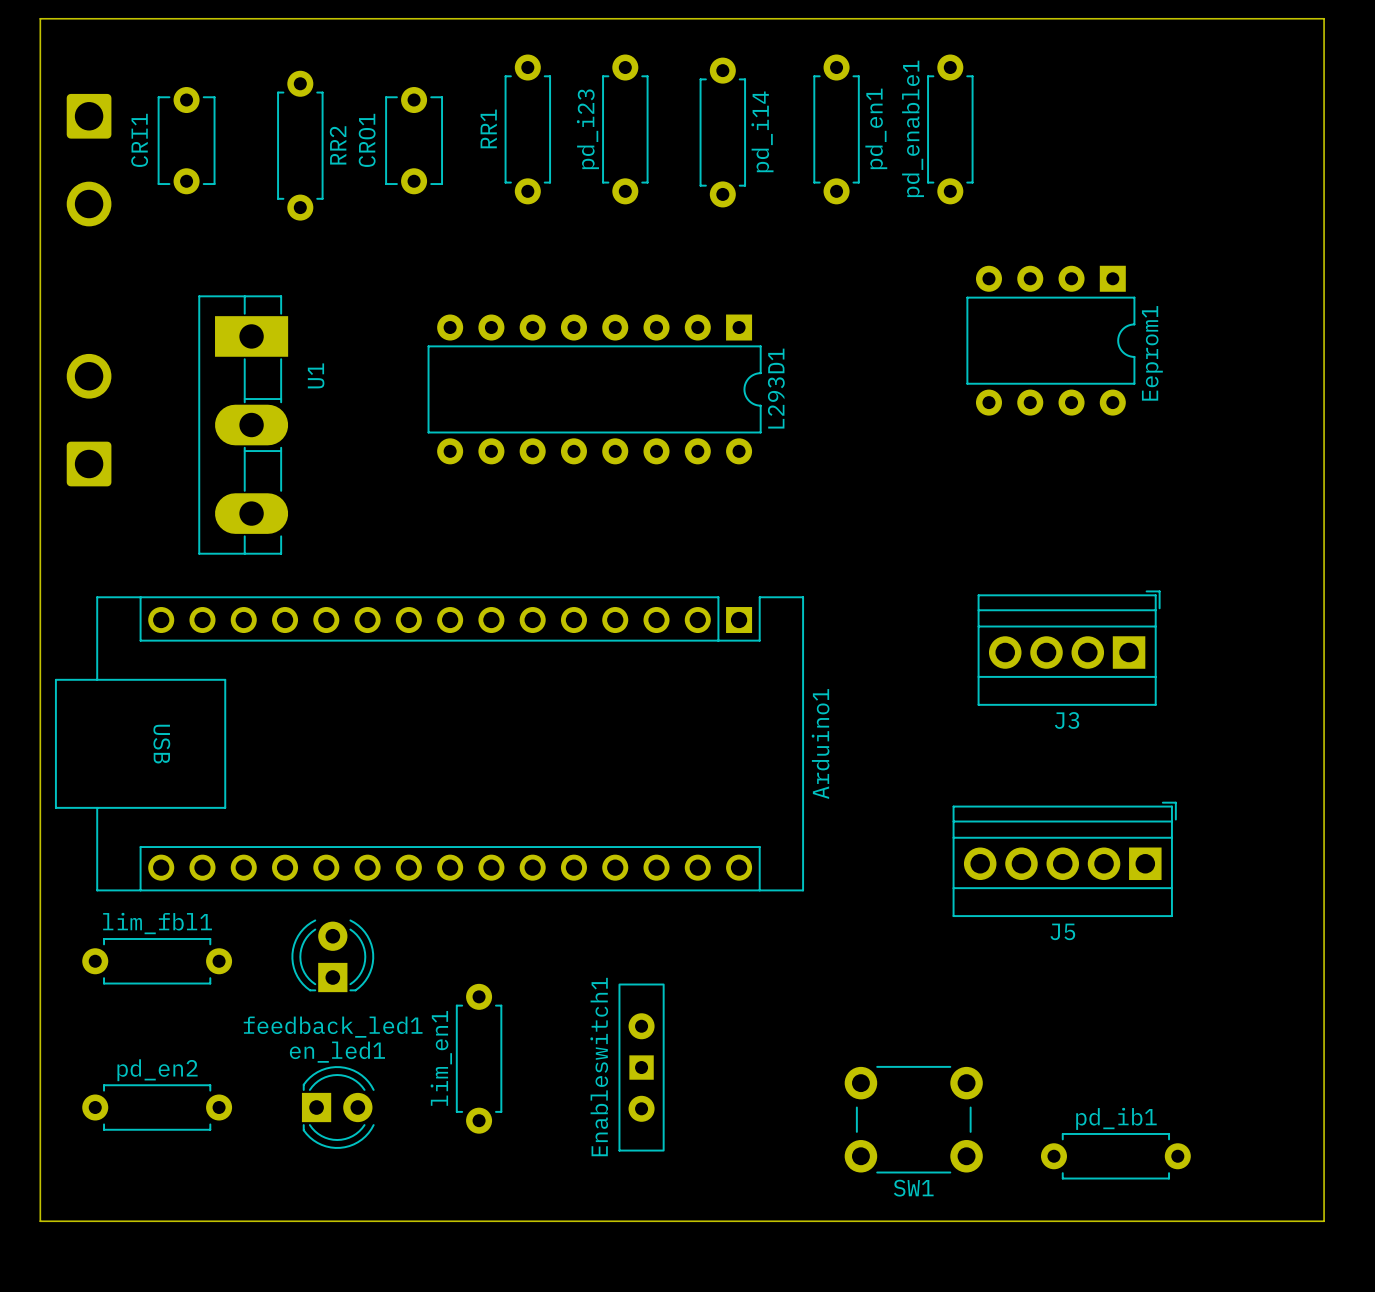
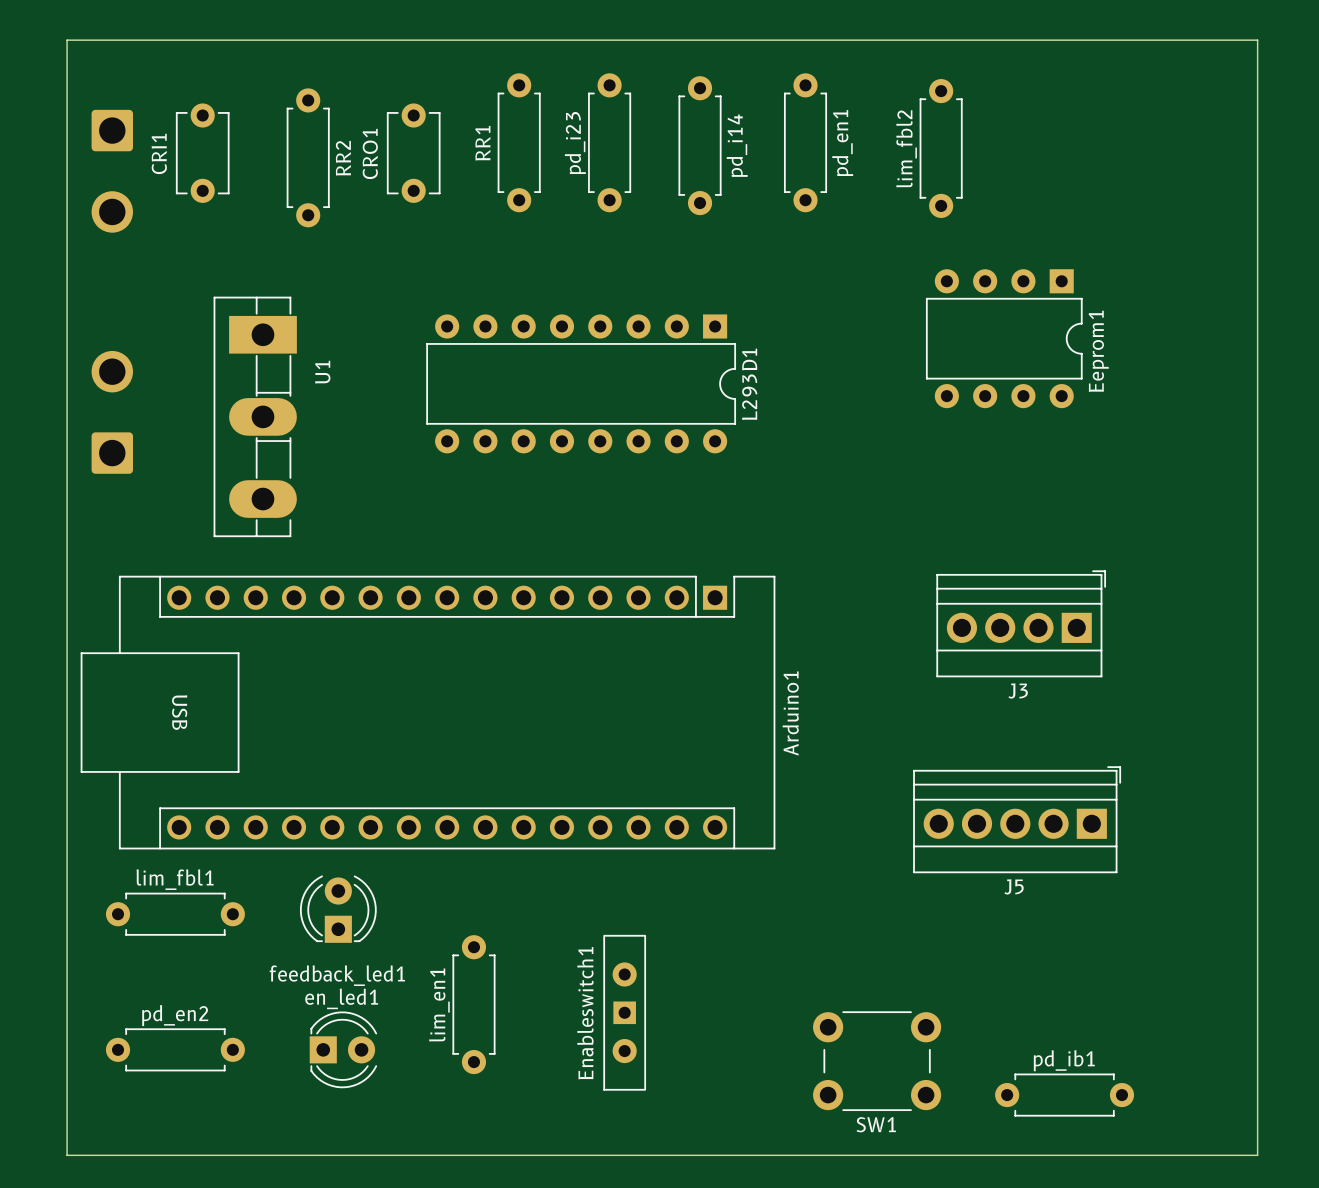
pd_enable1: (950, 129) -> none
lim_fbl2: none -> (941, 148)

